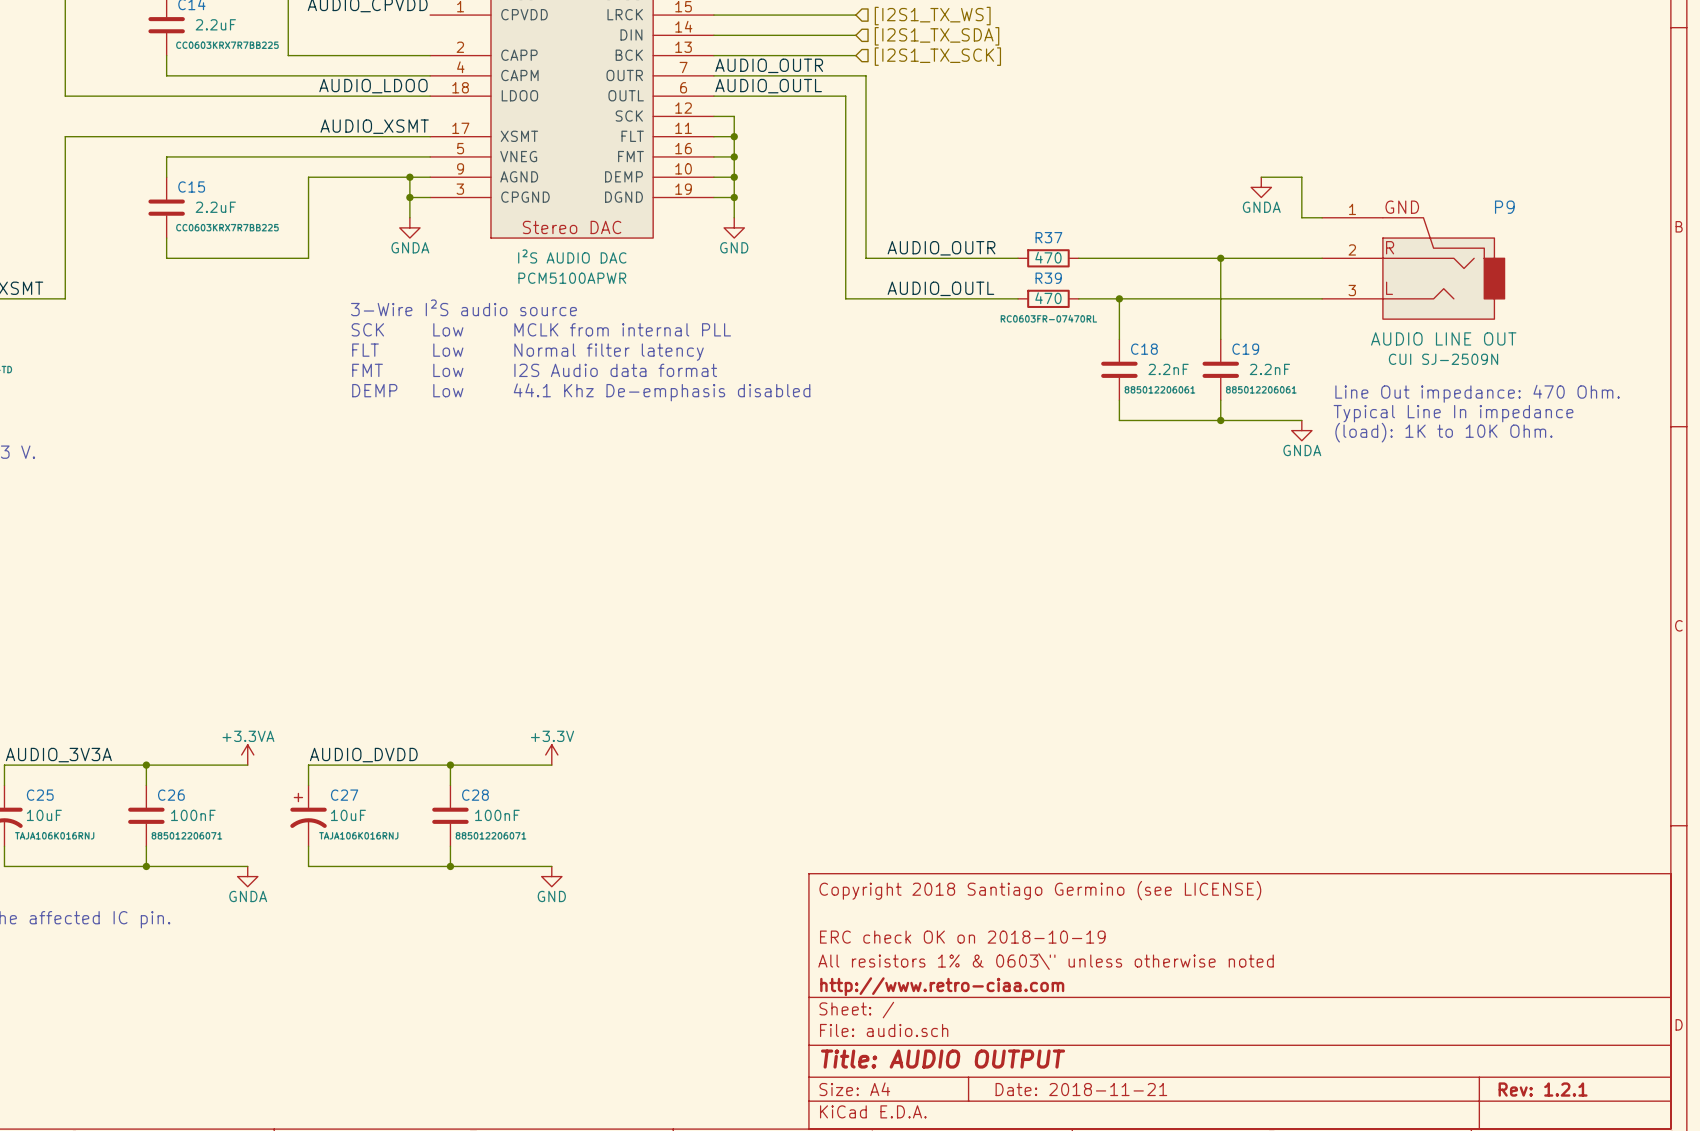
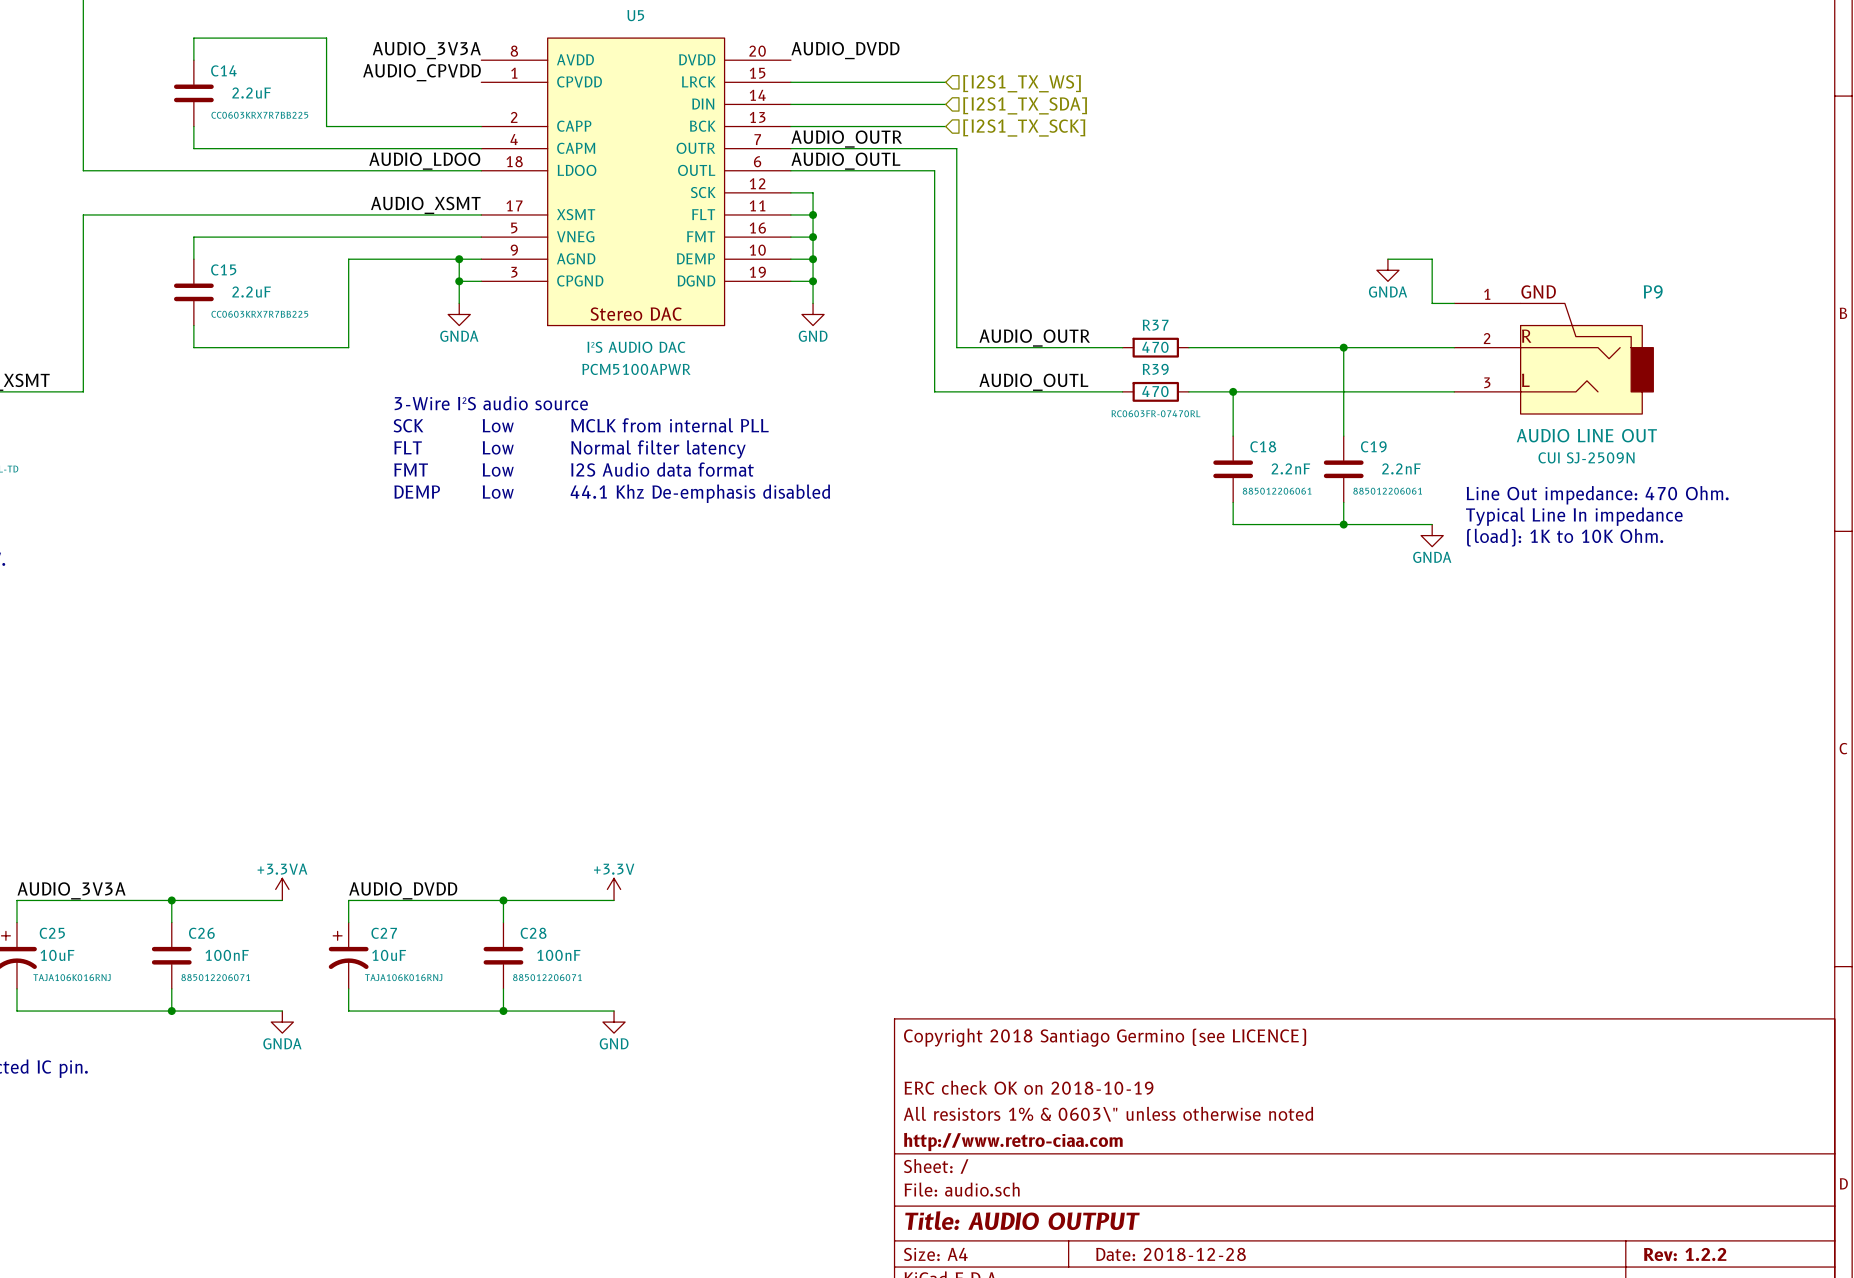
title block: Copyright 2018 Santiago Germino (see LICENSE) (1040, 890) -> Copyright 2018 Santiago Germino (see LICENCE) (1105, 1037)
title block: Date: 2018-11-21 (1081, 1089) -> Date: 2018-12-28 (1171, 1254)
title block: Rev: 1.2.1 (1543, 1089) -> Rev: 1.2.2 (1685, 1254)

